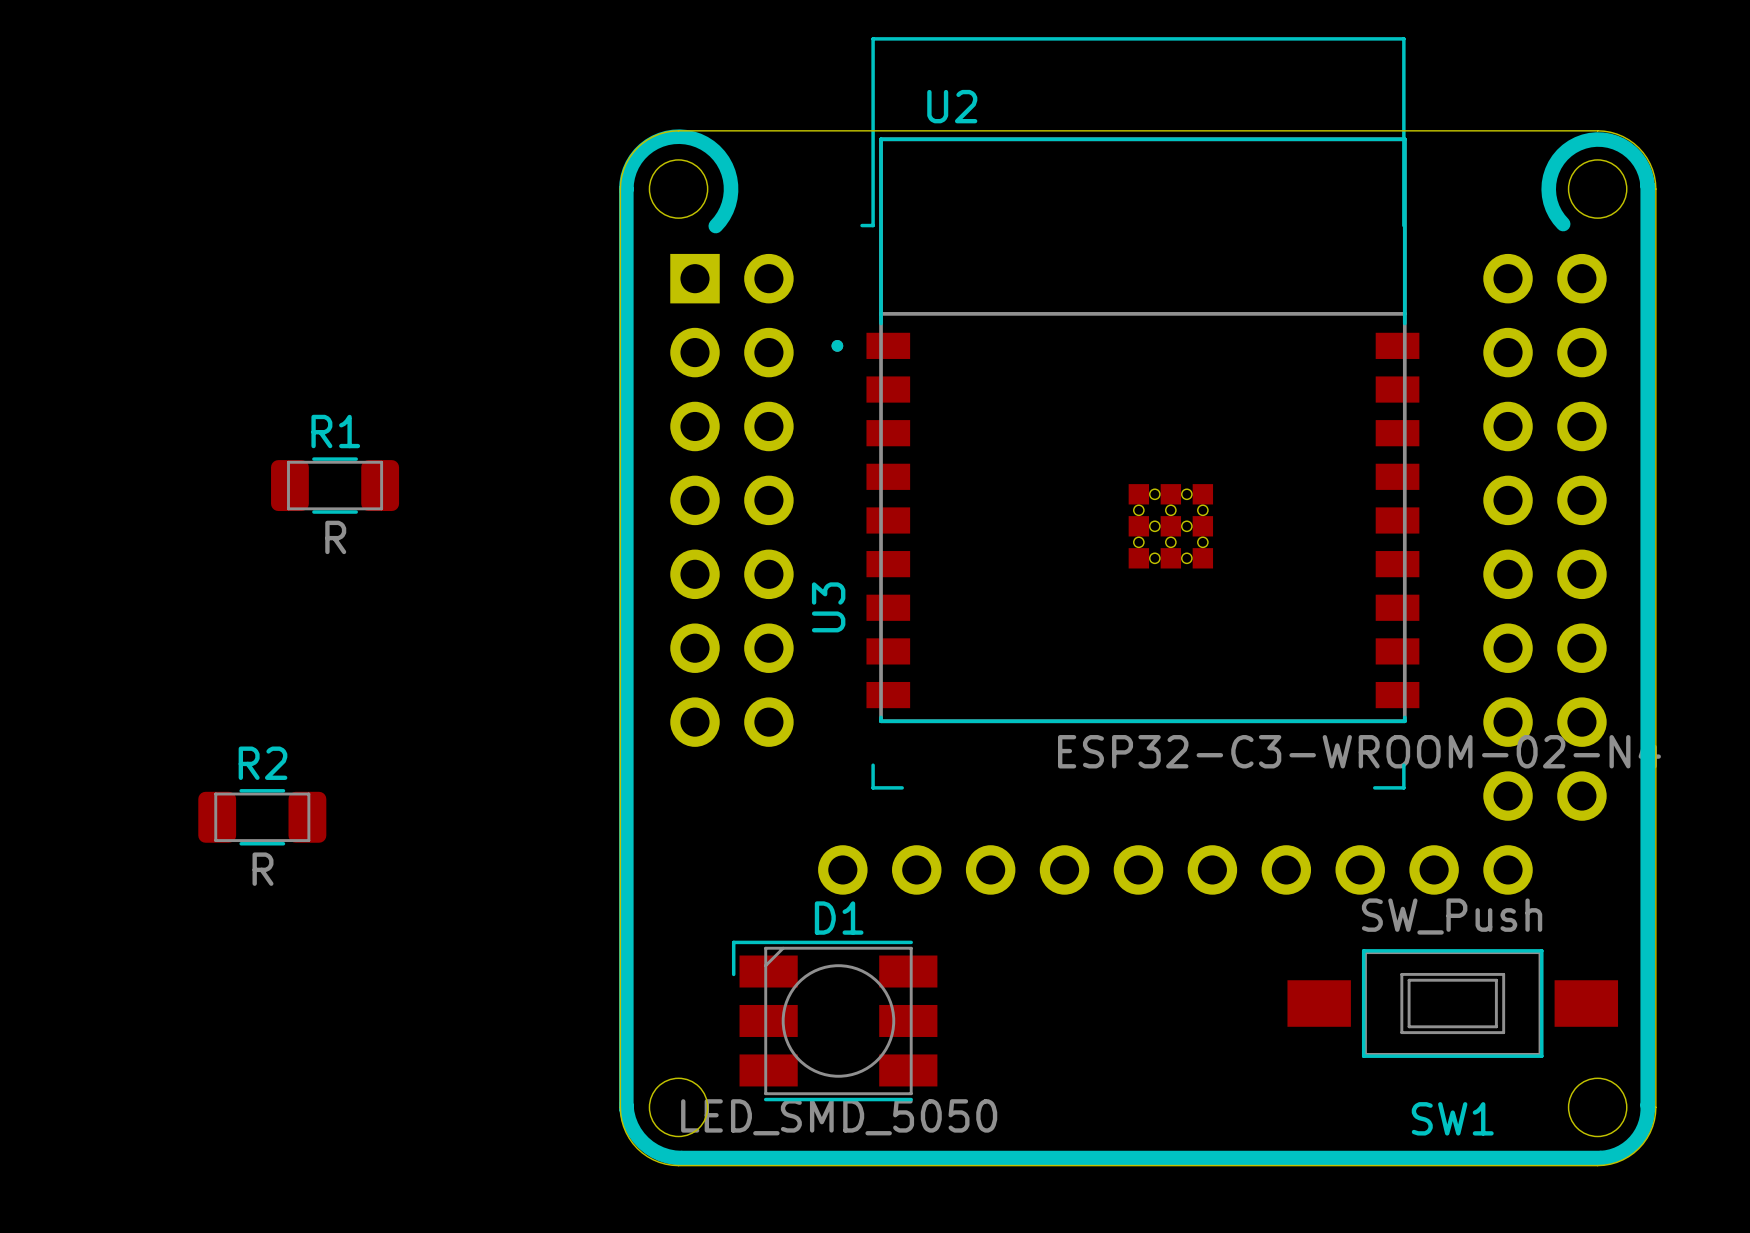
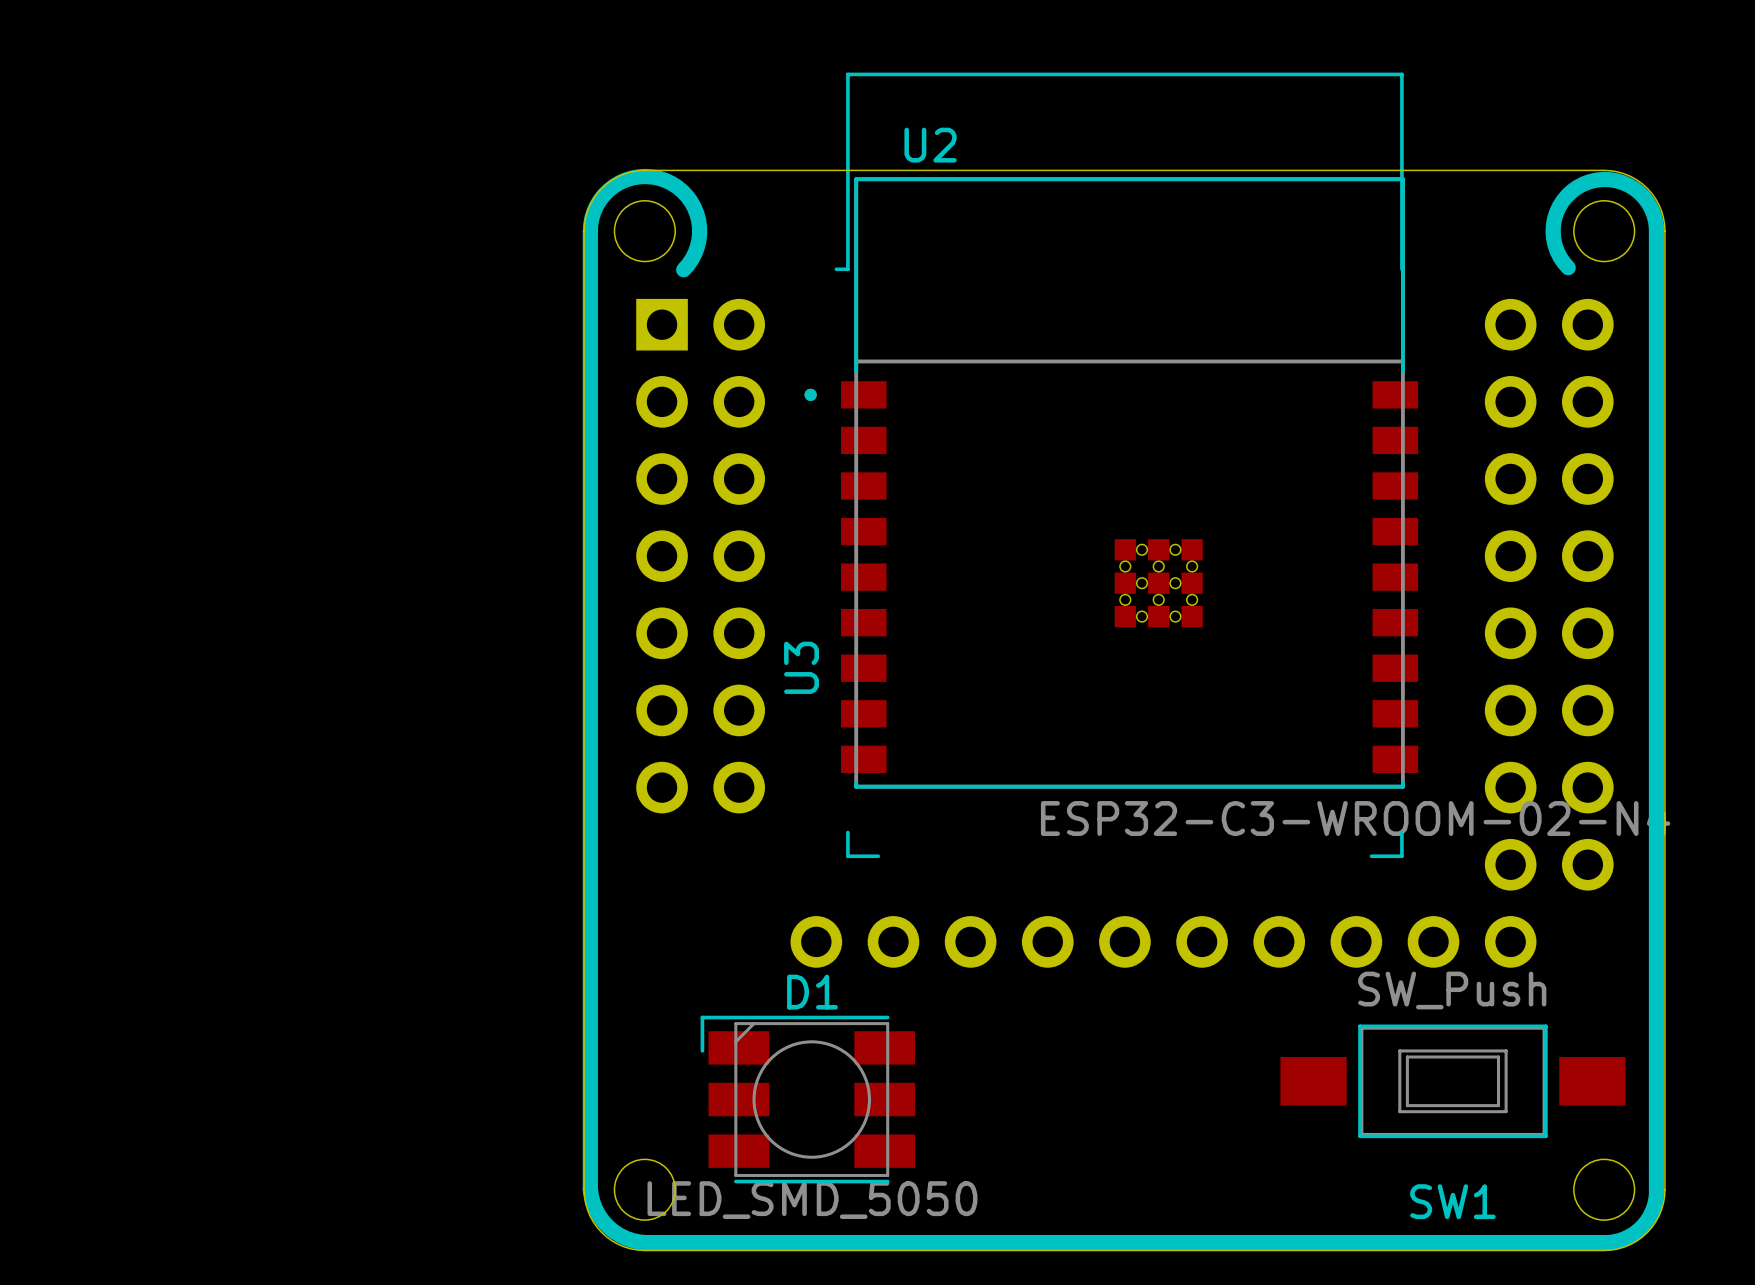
R1: R (335, 485) -> none
R2: R (262, 817) -> none

